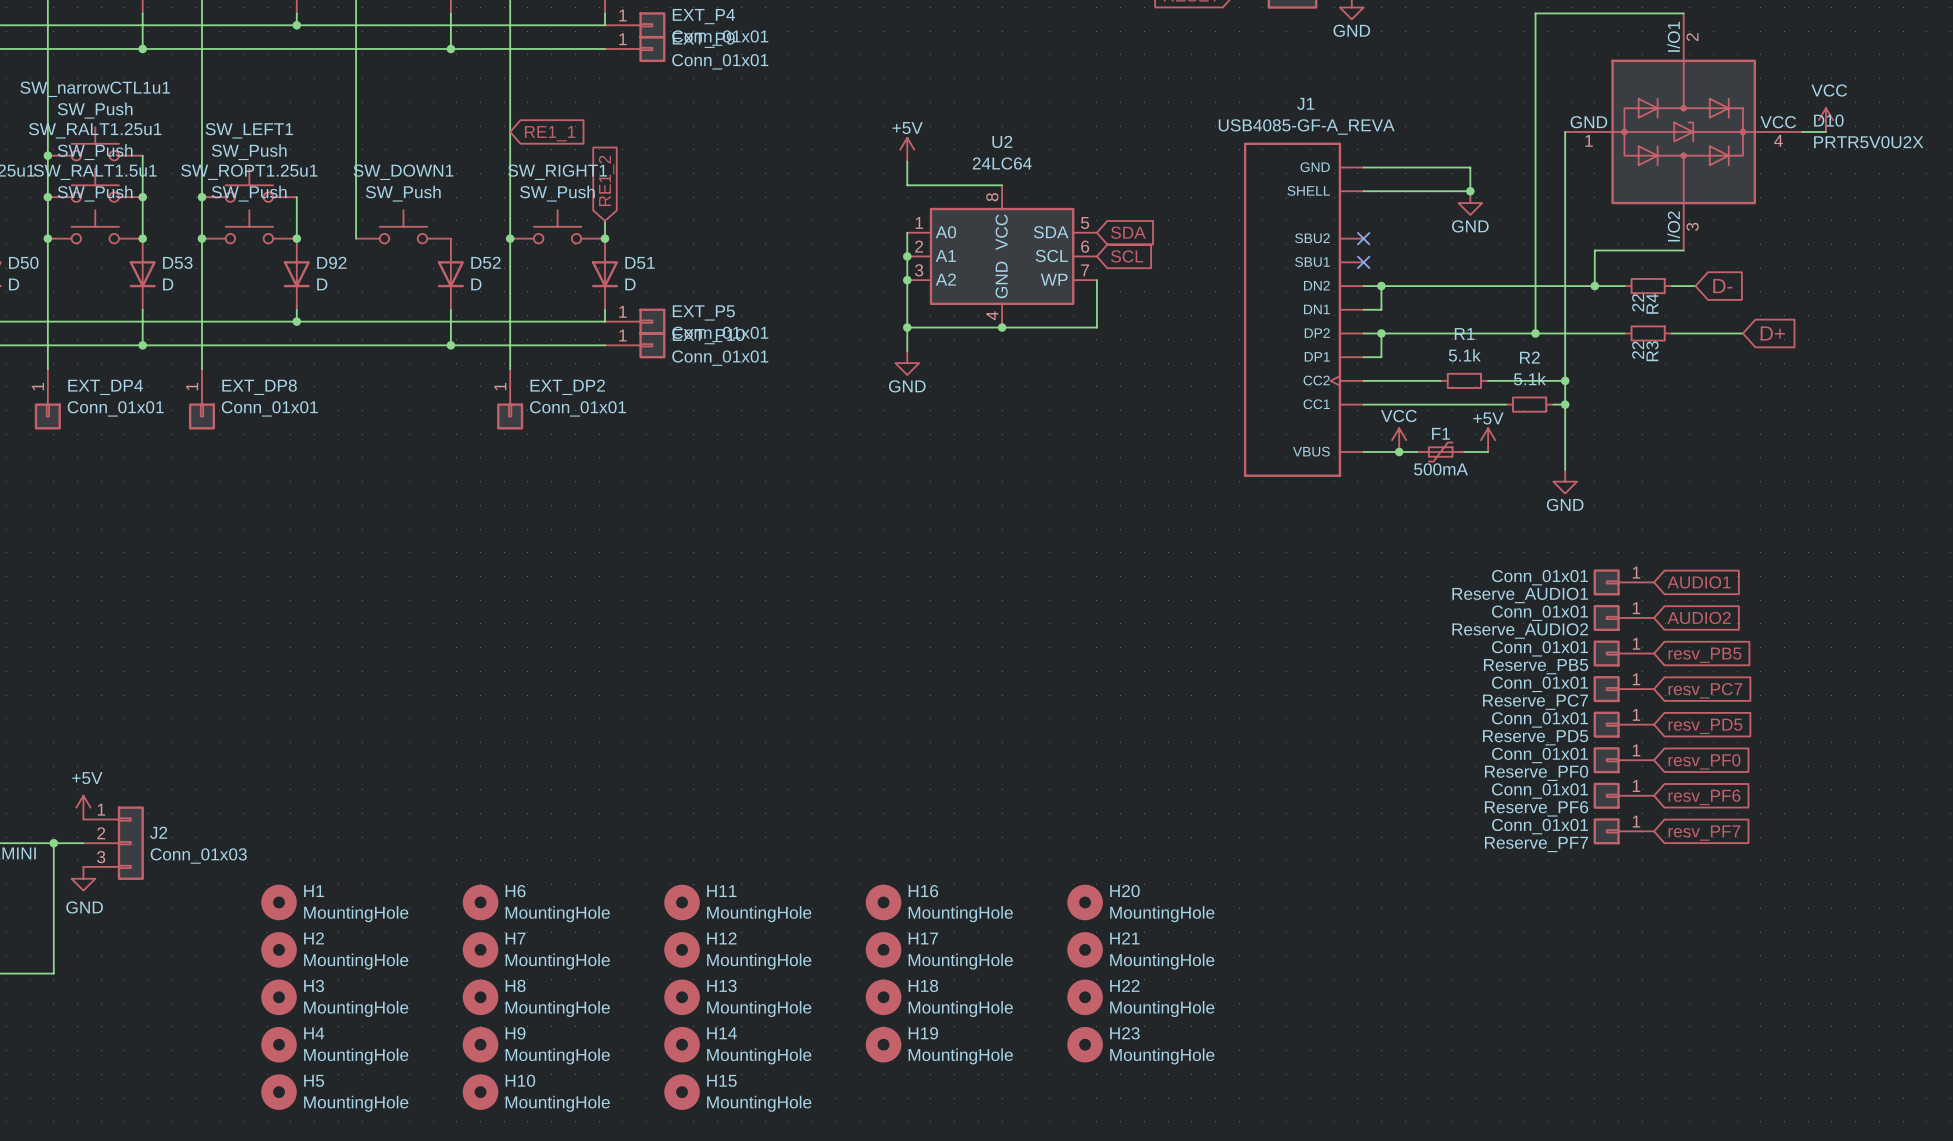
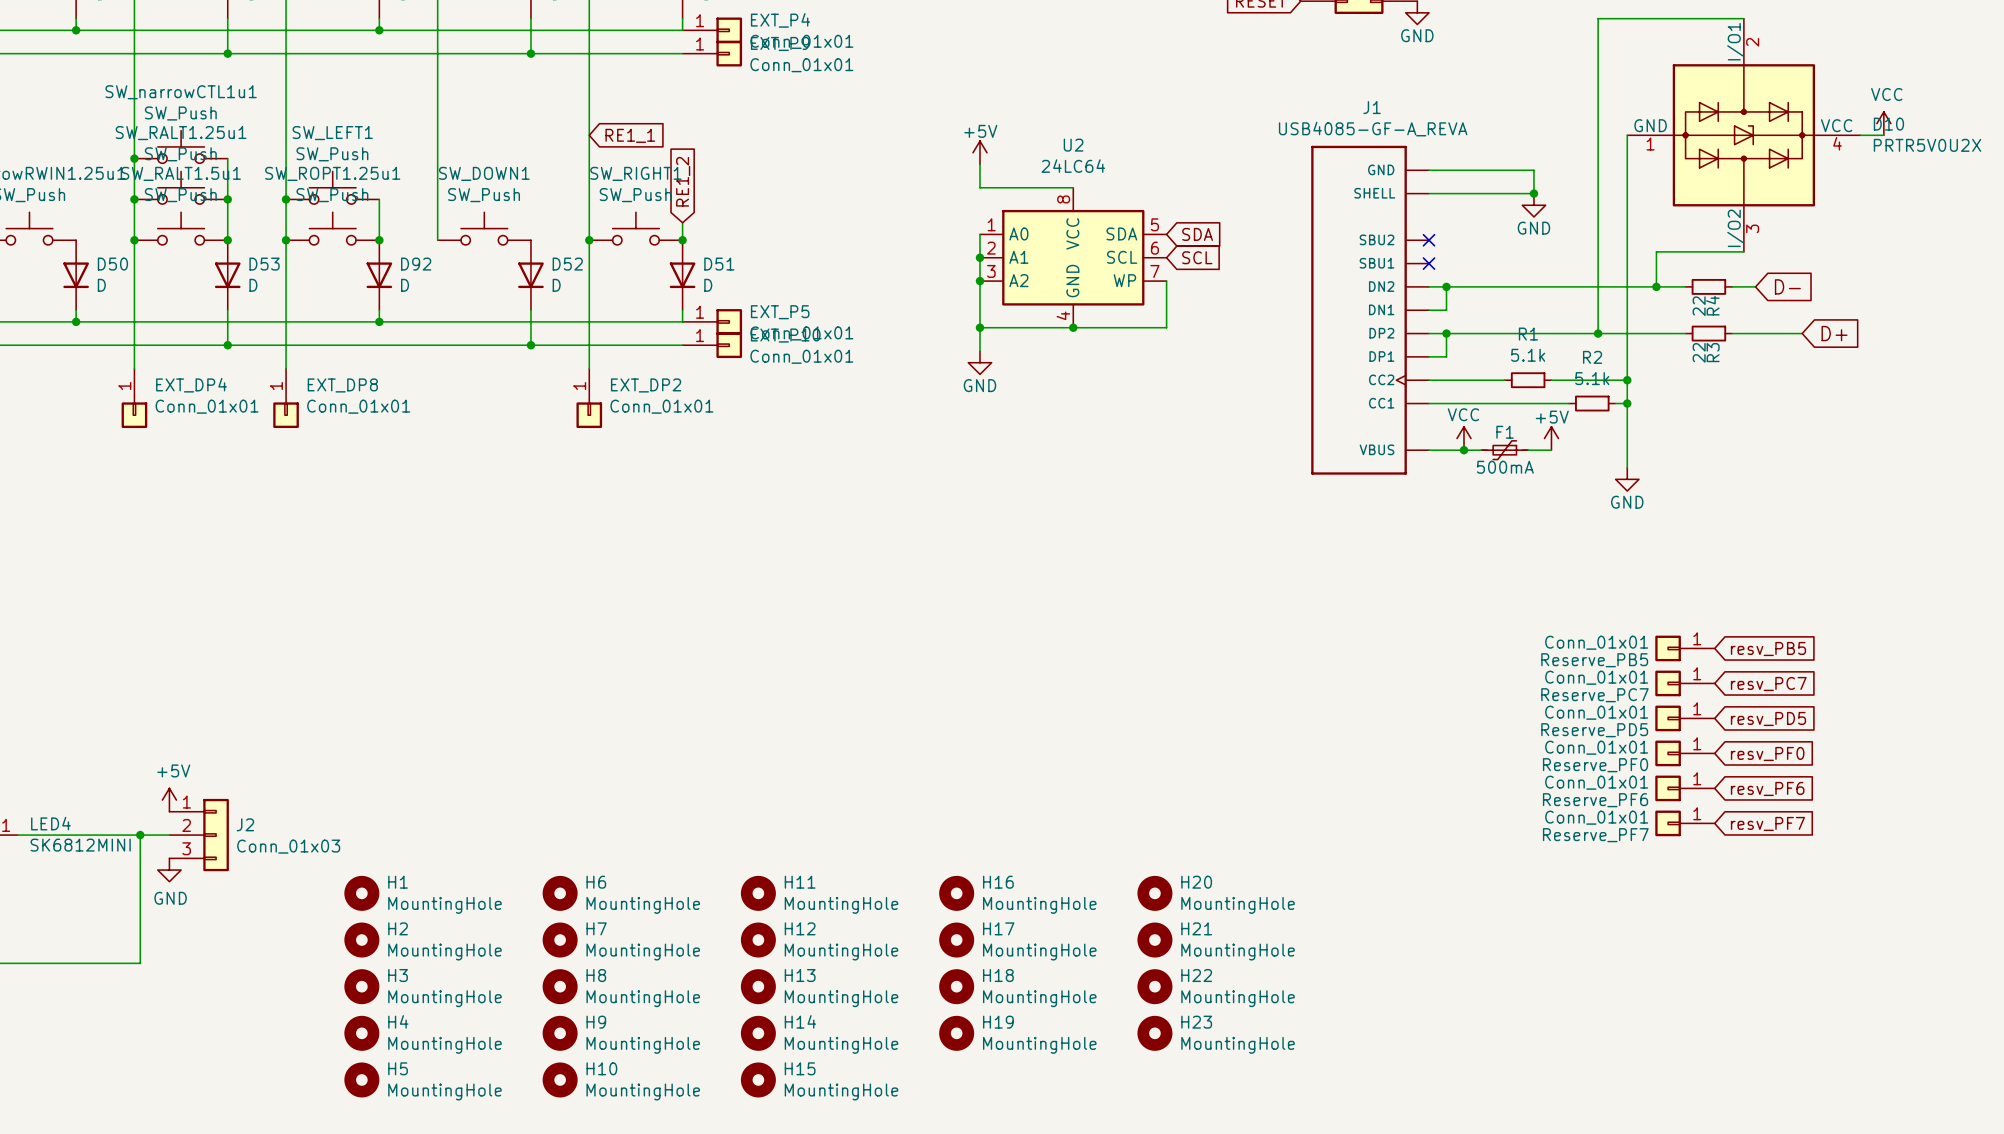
Reserve_AUDIO1: Conn_01x01 (1623, 582) -> none
global label: AUDIO1 (1699, 582) -> none
Reserve_AUDIO2: Conn_01x01 (1623, 617) -> none
global label: AUDIO2 (1699, 617) -> none

